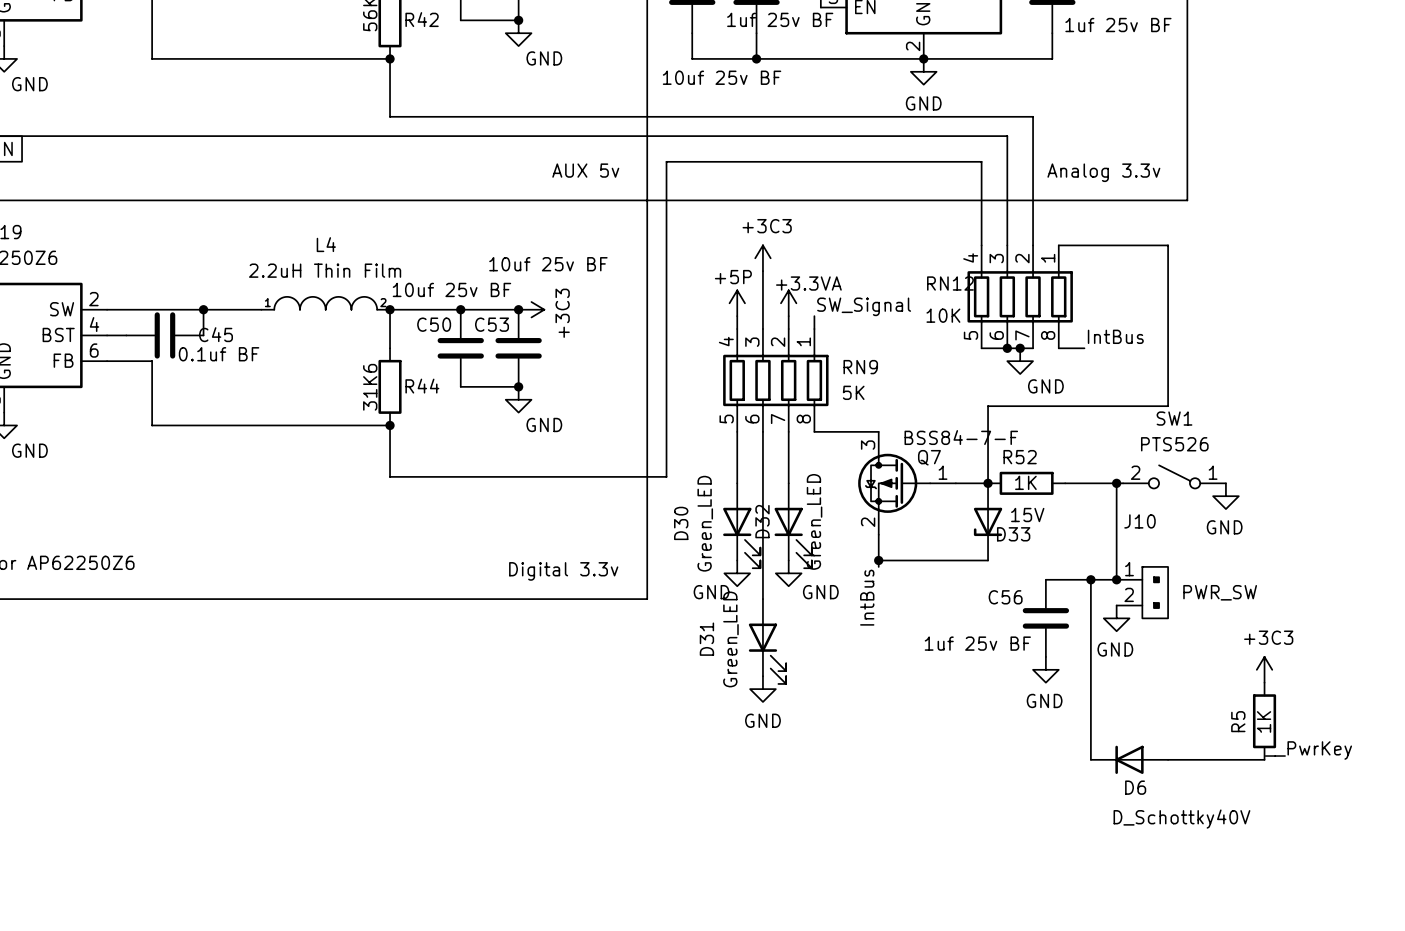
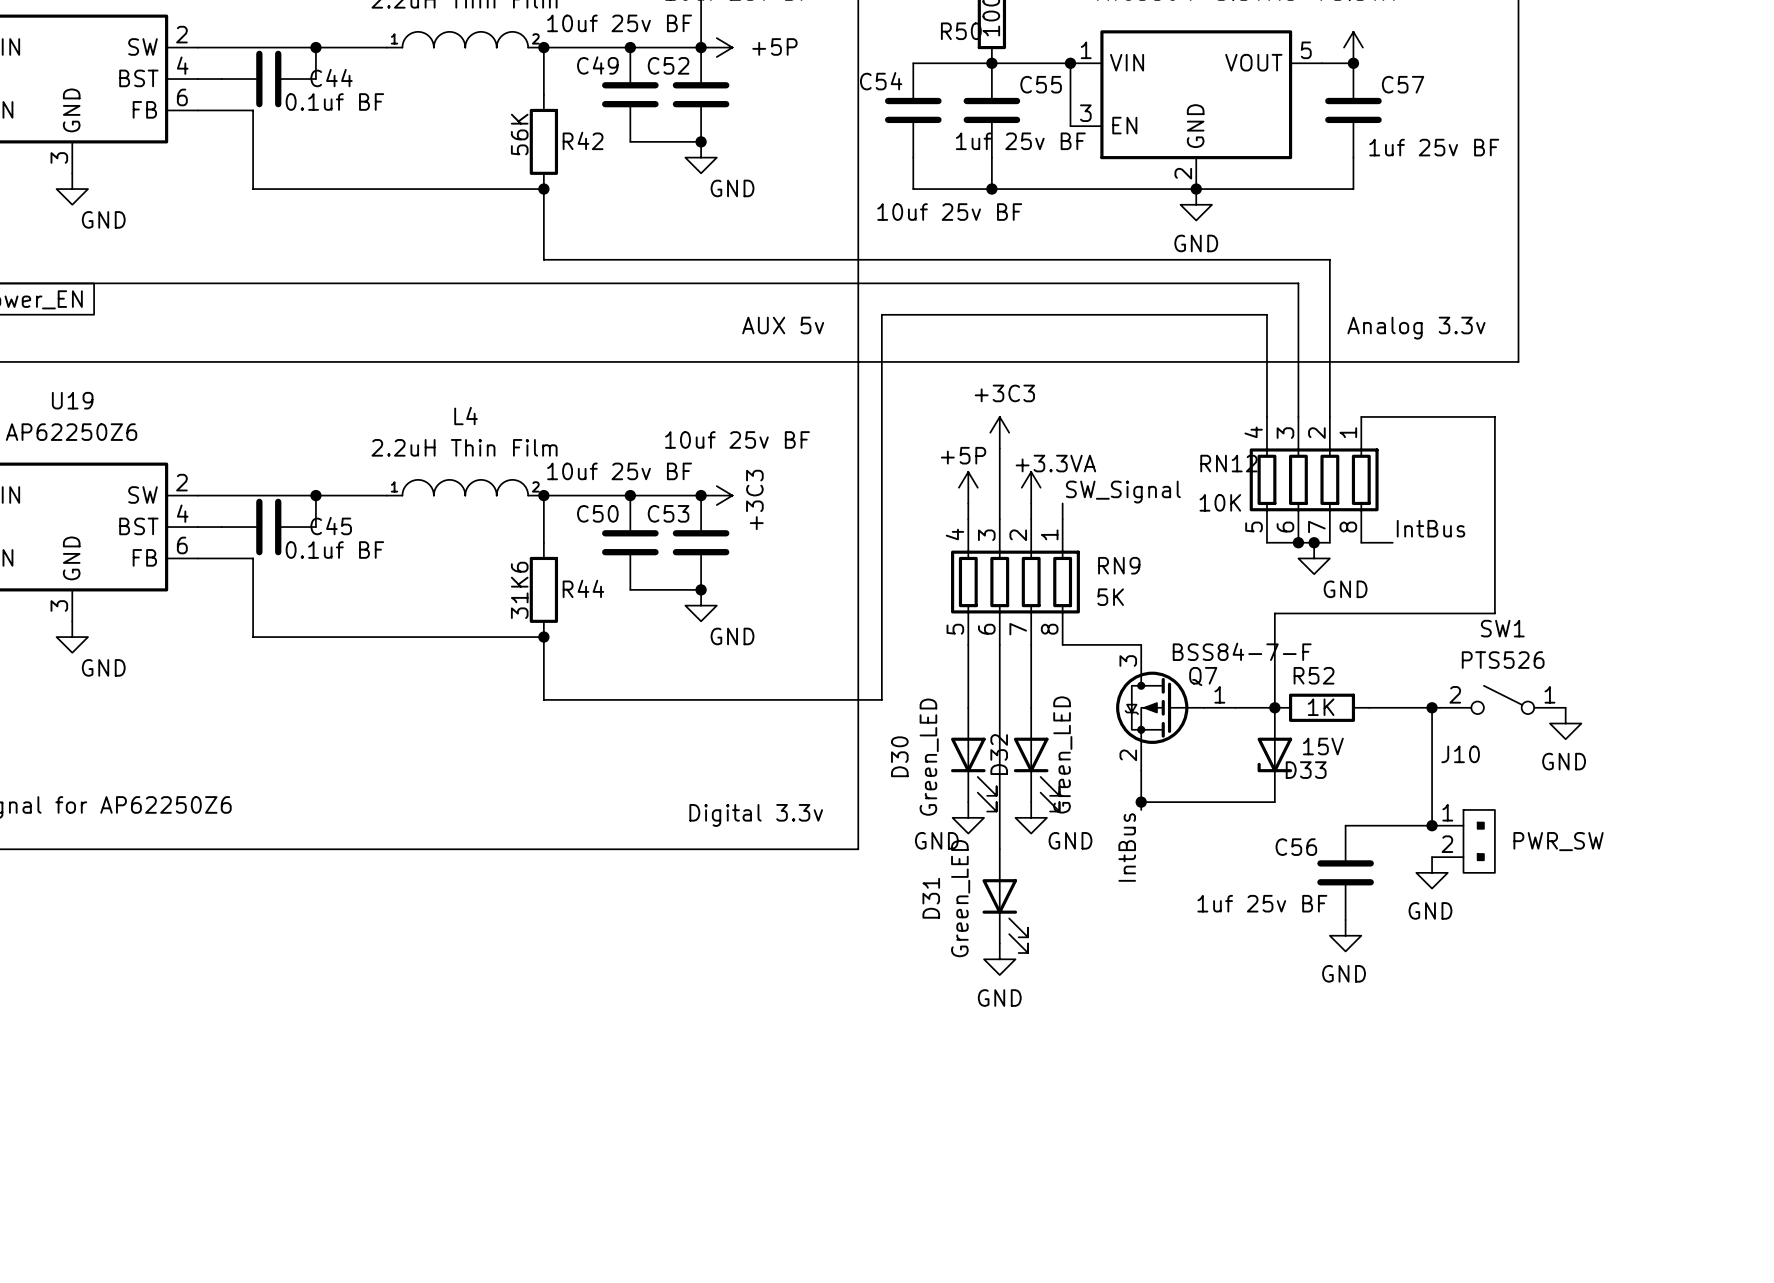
wire: (1090, 579) (1090, 759) -> none
junction: (1090, 579) -> none
power symbol: +3C3 (1264, 669) -> none
R5: 1K (1264, 721) -> none
label: __PwrKey (1308, 750) -> none
D6: D_Schottky40V (1129, 759) -> none
wire: (1168, 759) (1264, 759) -> none

